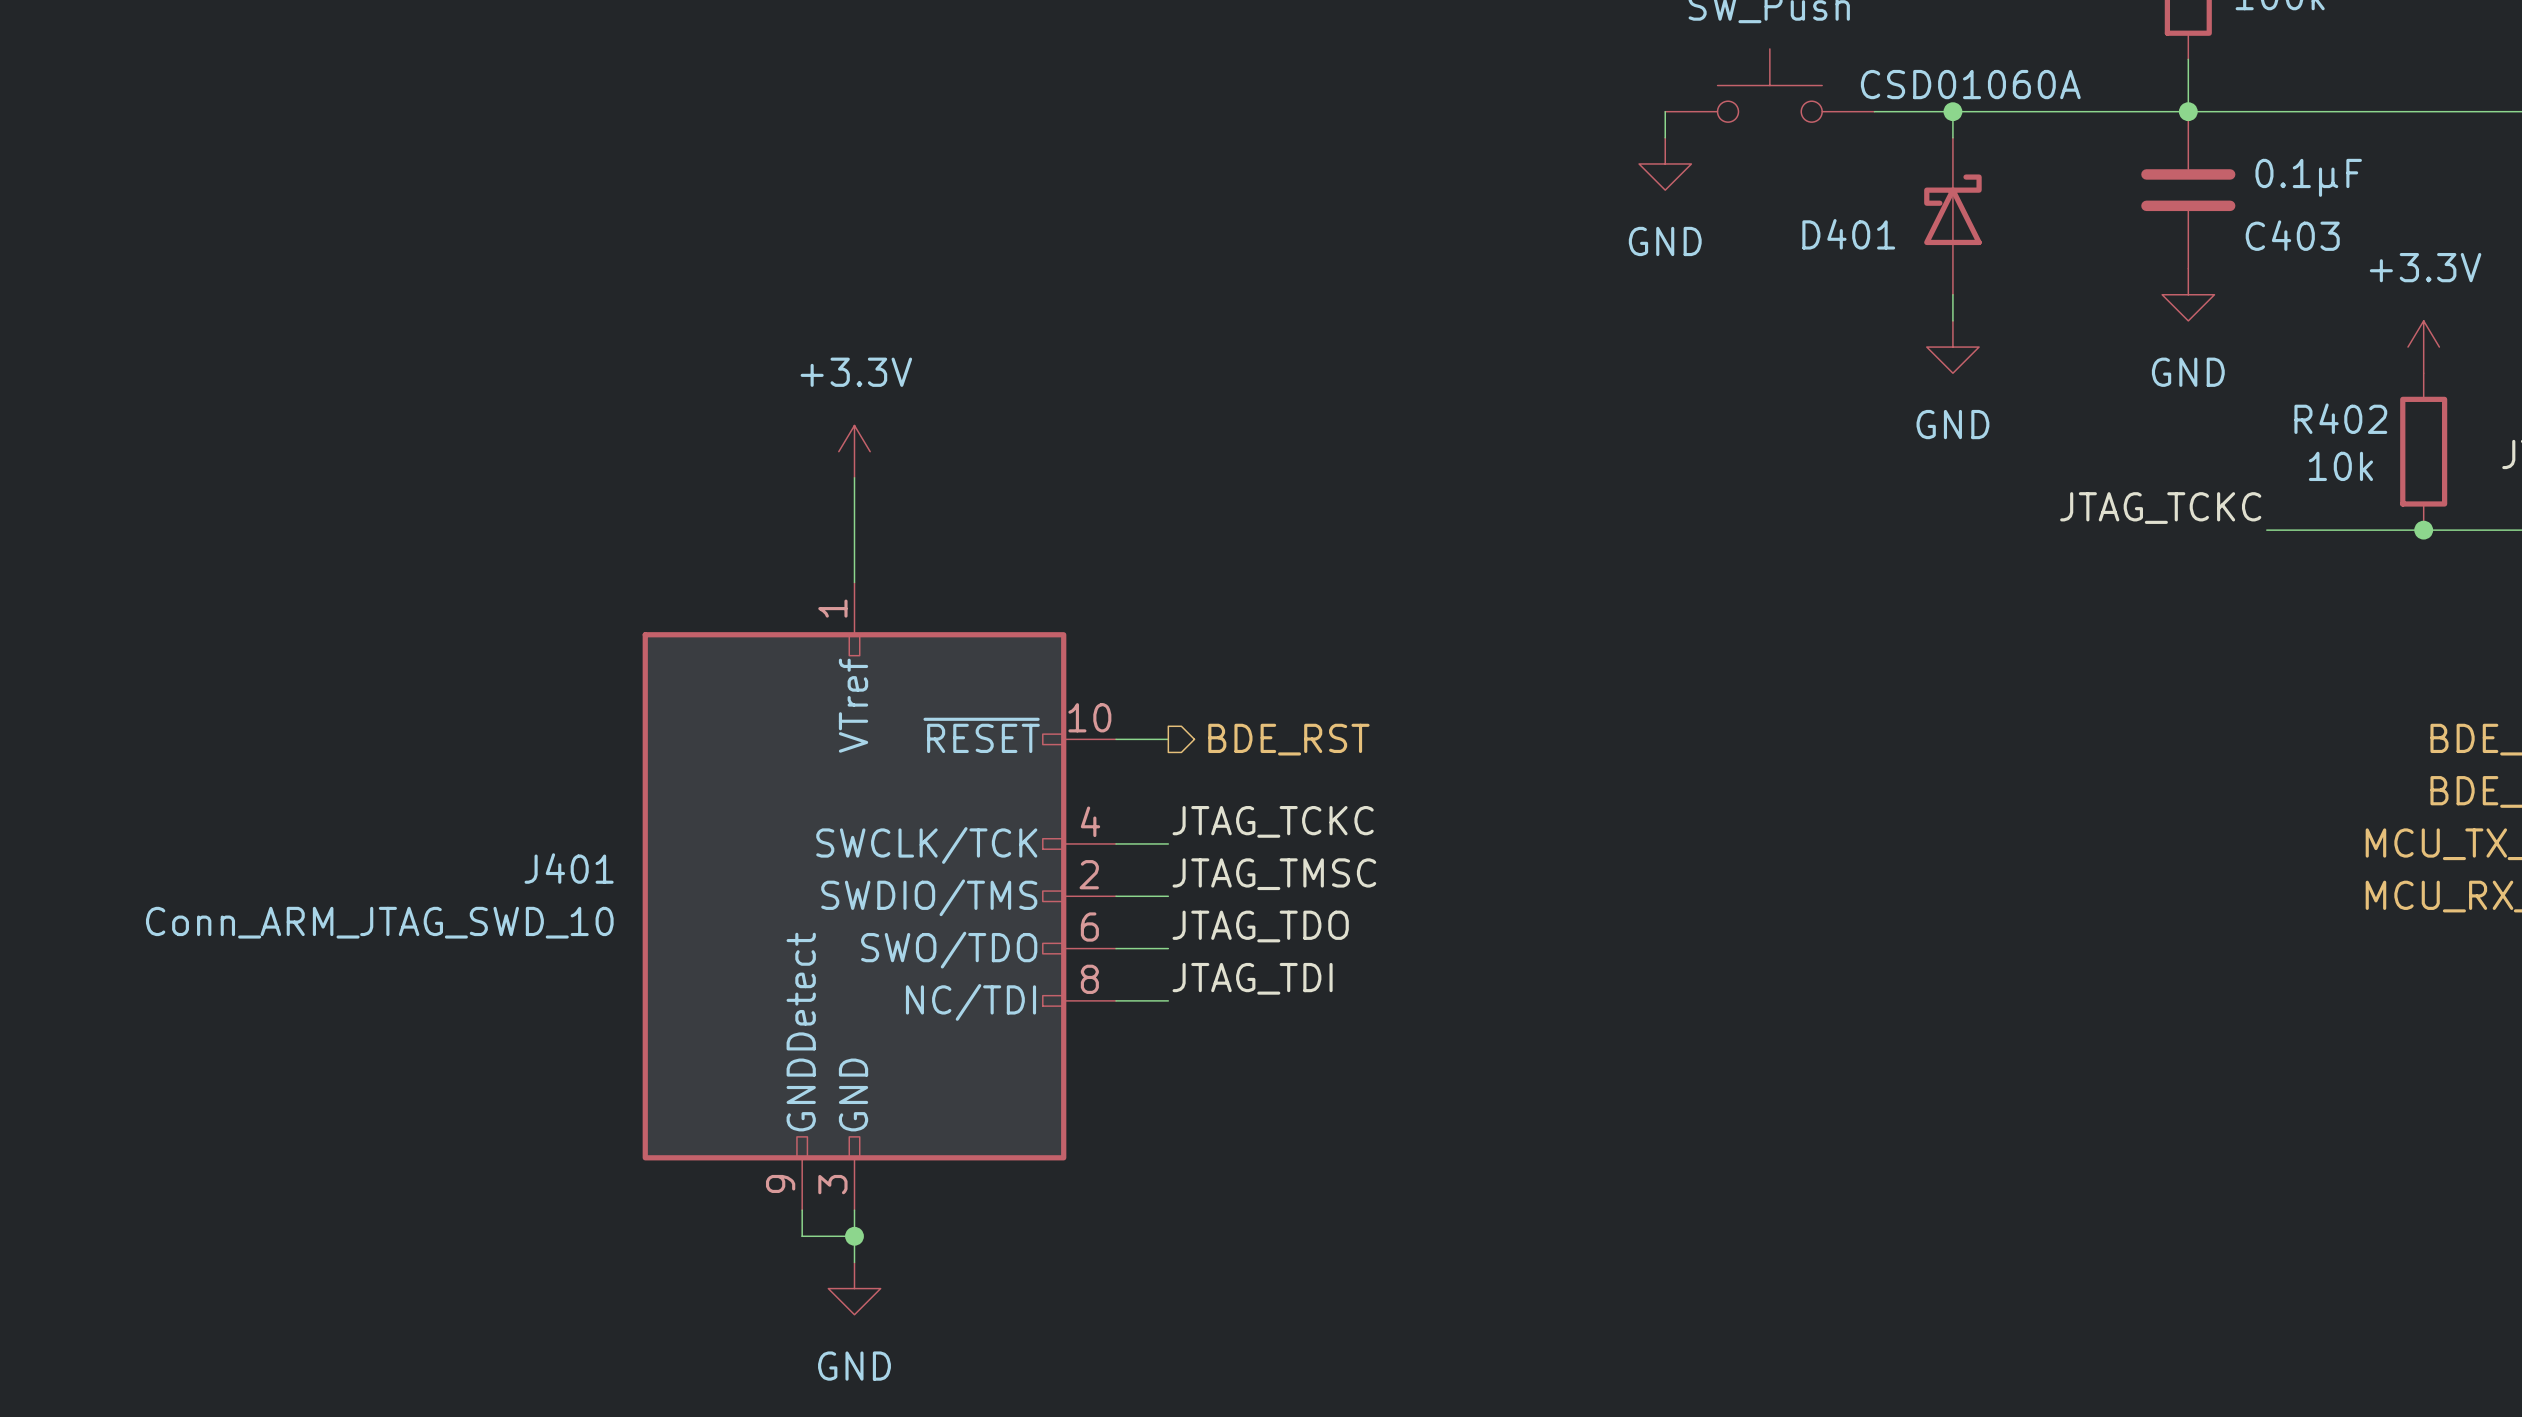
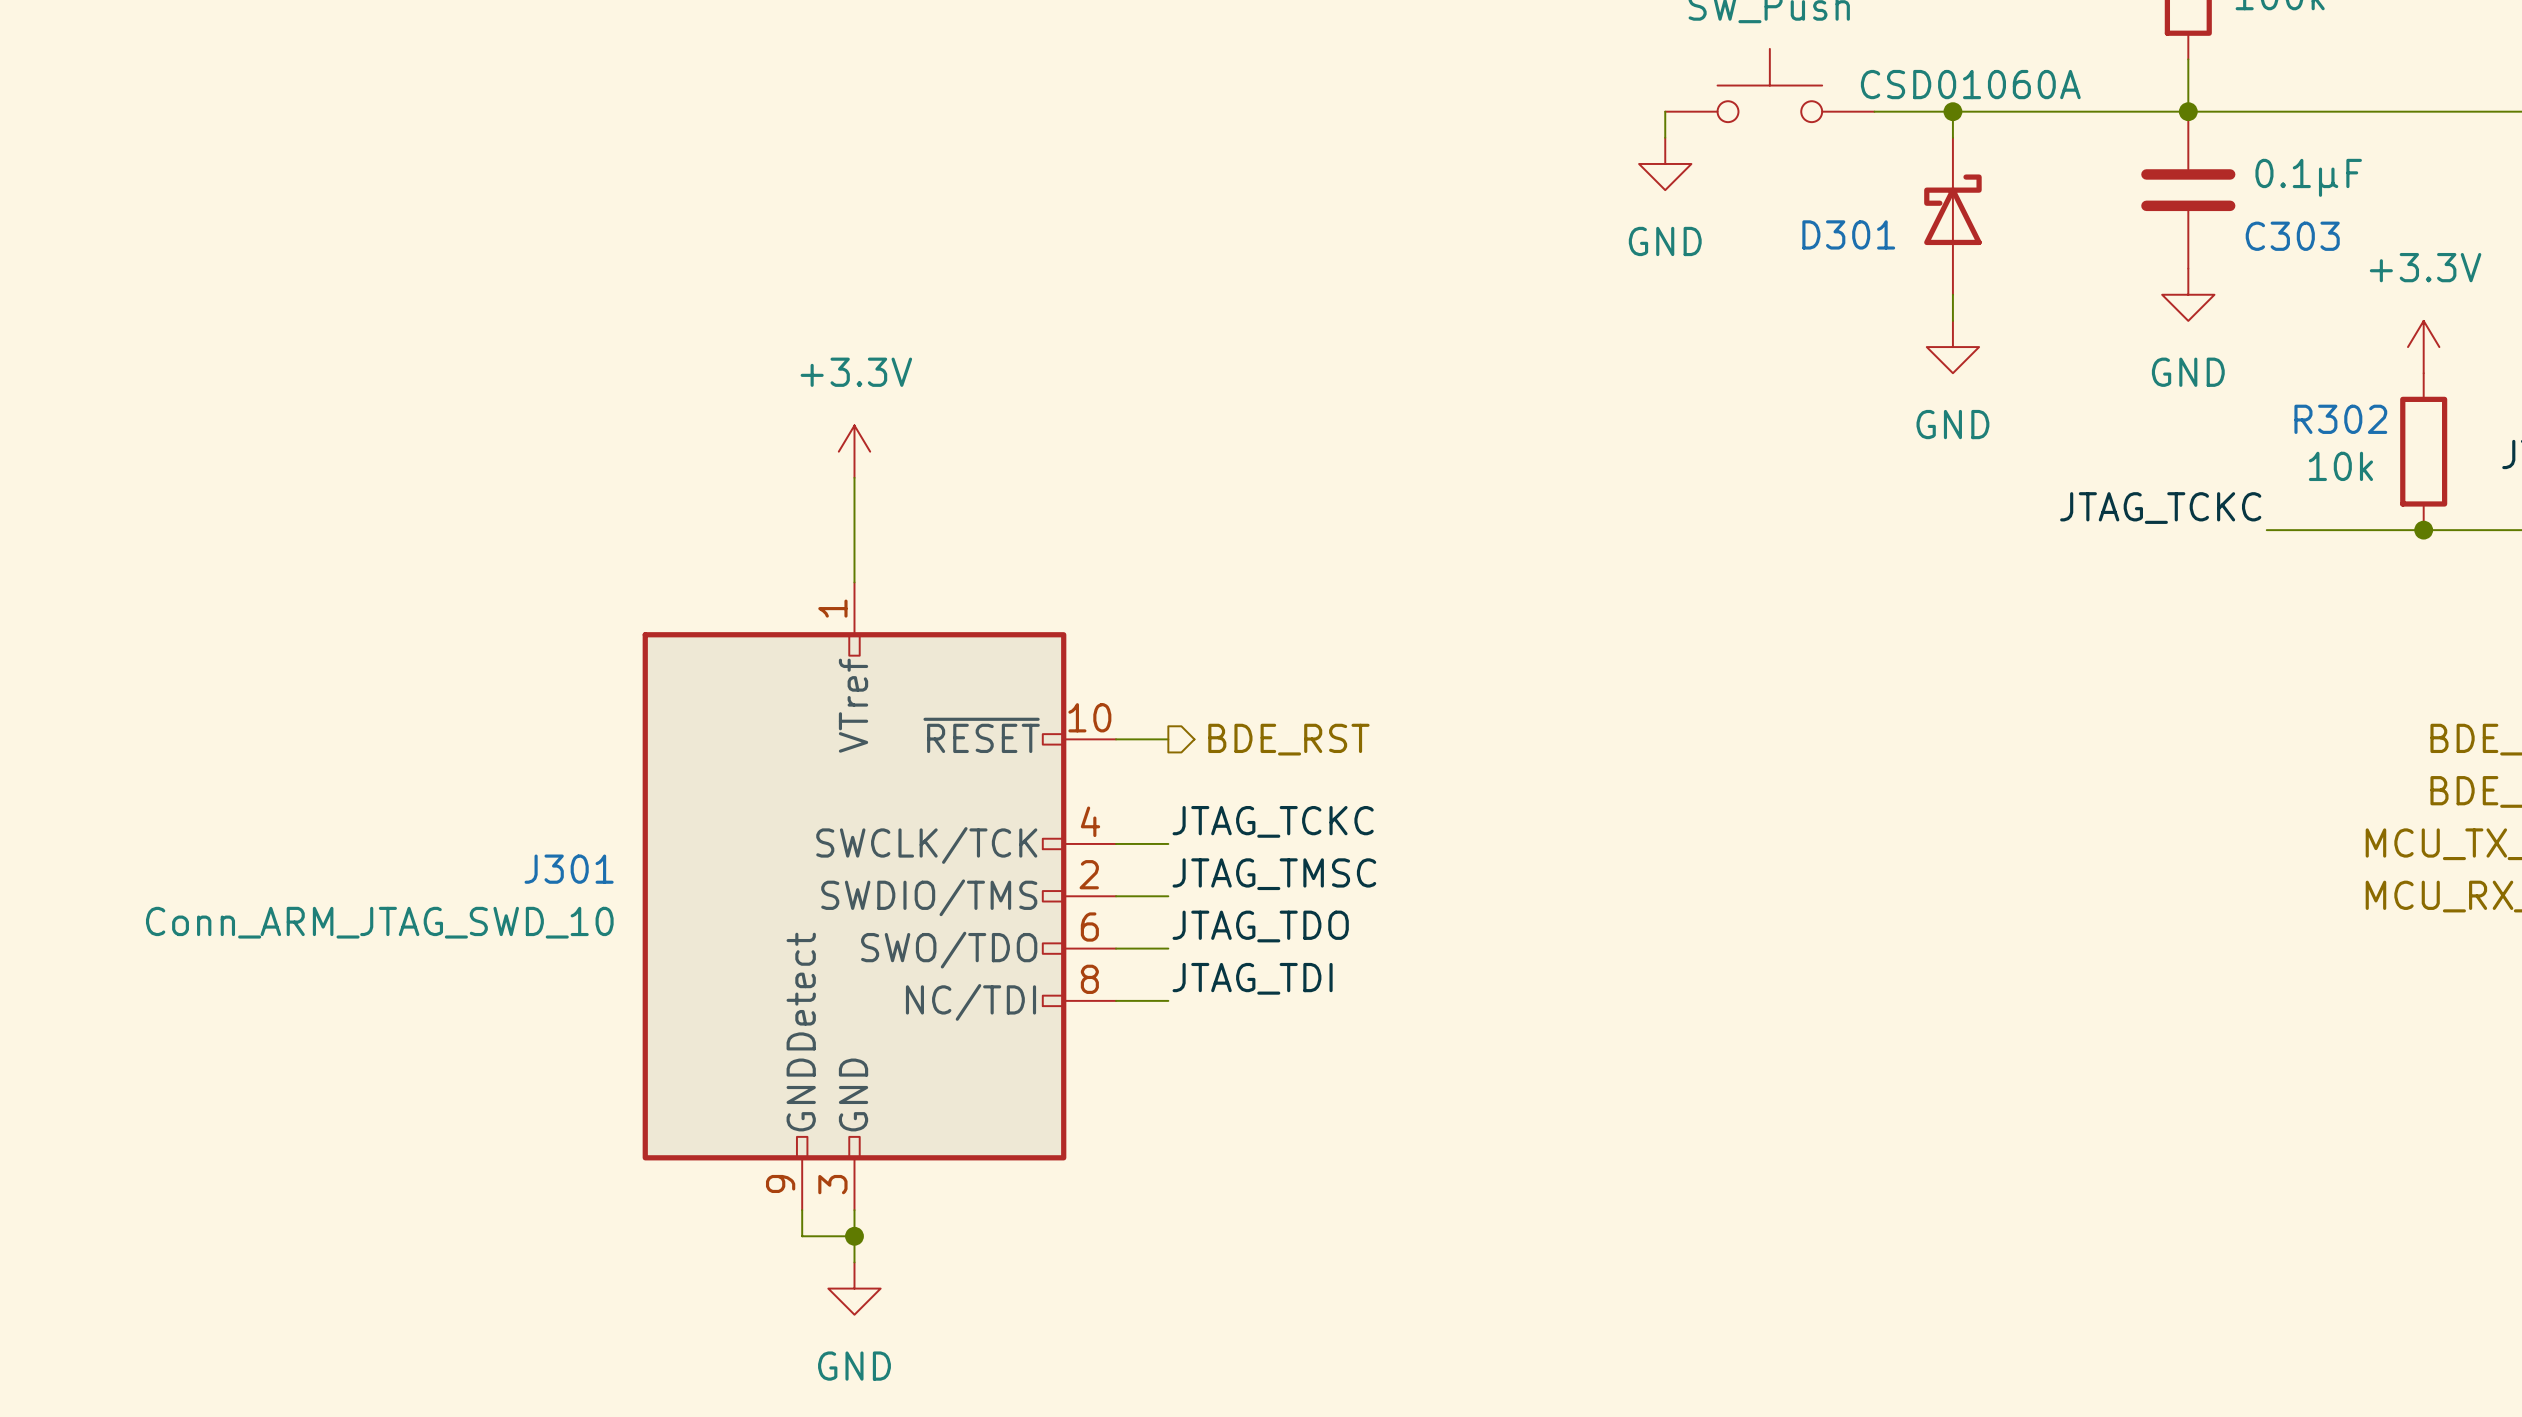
D401 name: D401 (1848, 234) -> D301 (1848, 234)
C403 name: C403 (2292, 235) -> C303 (2292, 236)
R402 name: R402 (2340, 418) -> R302 (2340, 419)
J401 name: J401 (569, 868) -> J301 (569, 869)

